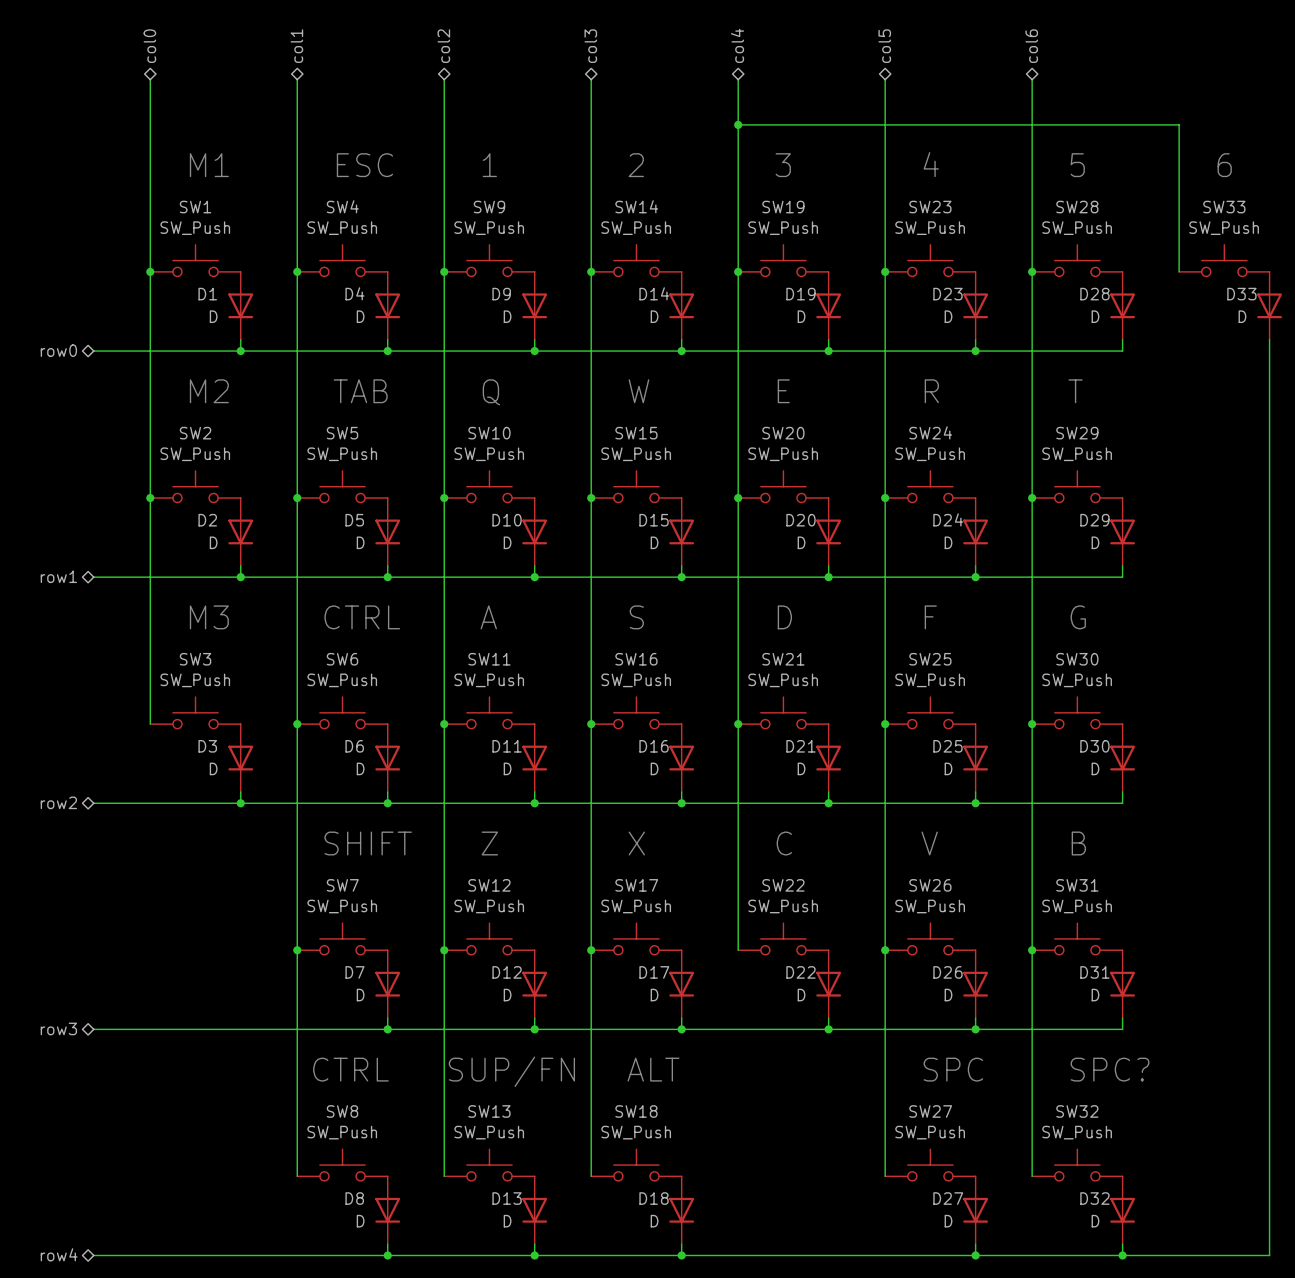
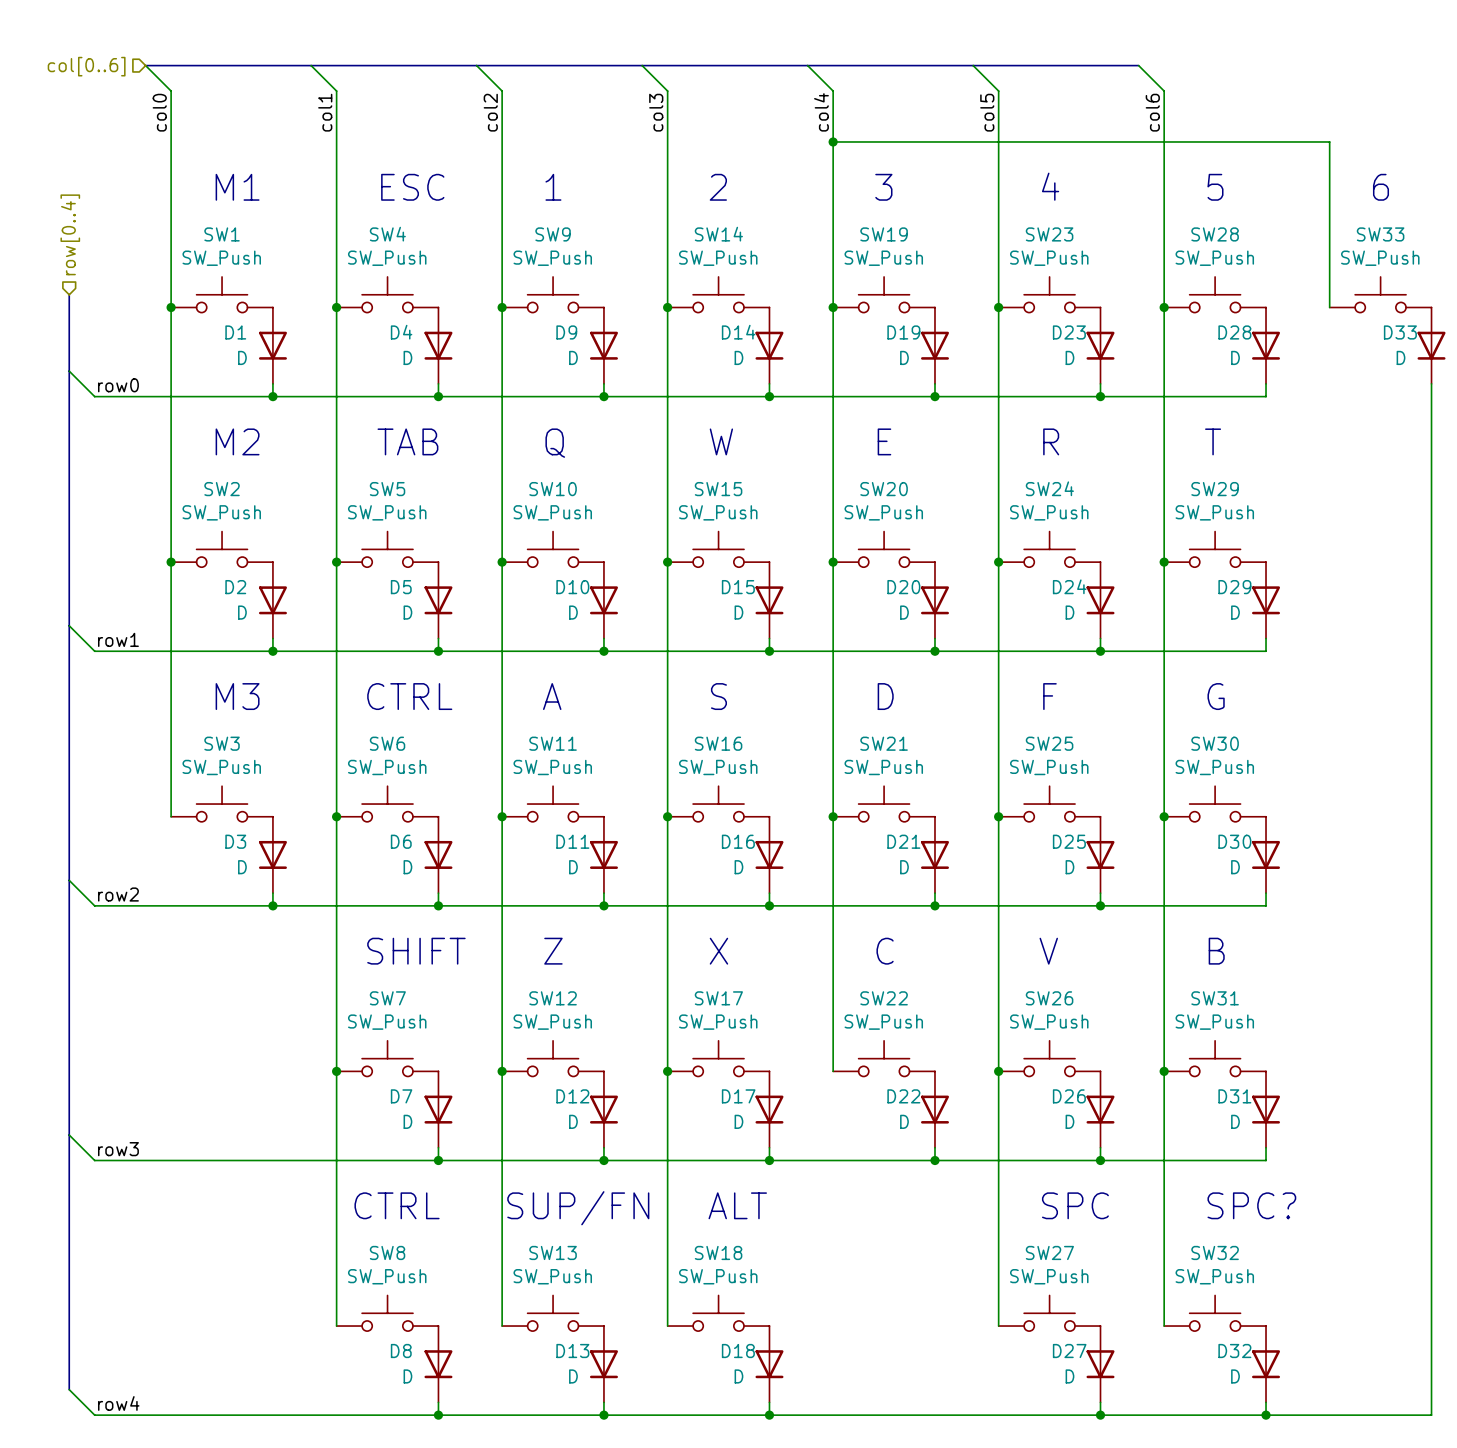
hierarchical label: col4 (737, 45) -> none
hierarchical label: col0 (149, 46) -> none
hierarchical label: col1 (296, 46) -> none
hierarchical label: col2 (443, 46) -> none
hierarchical label: col3 (590, 46) -> none
hierarchical label: col5 (884, 46) -> none
hierarchical label: col6 (1031, 46) -> none
wire: none -> (145, 65) (171, 91)
bus: none -> (145, 65) (1138, 65)
wire: none -> (311, 65) (336, 91)
wire: none -> (476, 65) (502, 91)
wire: none -> (642, 65) (667, 91)
wire: none -> (807, 65) (833, 91)
wire: none -> (973, 65) (998, 91)
wire: none -> (1138, 65) (1164, 91)
hierarchical label: none -> col[0..6] (86, 66)
label: none -> col0 (159, 112)
label: none -> col1 (325, 112)
label: none -> col2 (490, 112)
label: none -> col3 (656, 112)
label: none -> col4 (821, 112)
label: none -> col5 (987, 112)
label: none -> col6 (1152, 112)
hierarchical label: none -> row[0..4] (70, 234)
bus: none -> (69, 294) (69, 1389)
wire: none -> (69, 371) (94, 396) (107, 396)
label: none -> row0 (118, 385)
hierarchical label: row0 (58, 350) -> none
wire: none -> (69, 625) (94, 651) (107, 651)
label: none -> row1 (118, 639)
hierarchical label: row1 (58, 576) -> none
wire: none -> (69, 880) (94, 905) (107, 905)
label: none -> row2 (118, 894)
hierarchical label: row2 (58, 802) -> none
wire: none -> (69, 1135) (94, 1160) (107, 1160)
label: none -> row3 (118, 1149)
hierarchical label: row3 (58, 1028) -> none
wire: none -> (69, 1389) (94, 1415) (107, 1415)
label: none -> row4 (118, 1403)
hierarchical label: row4 (59, 1254) -> none

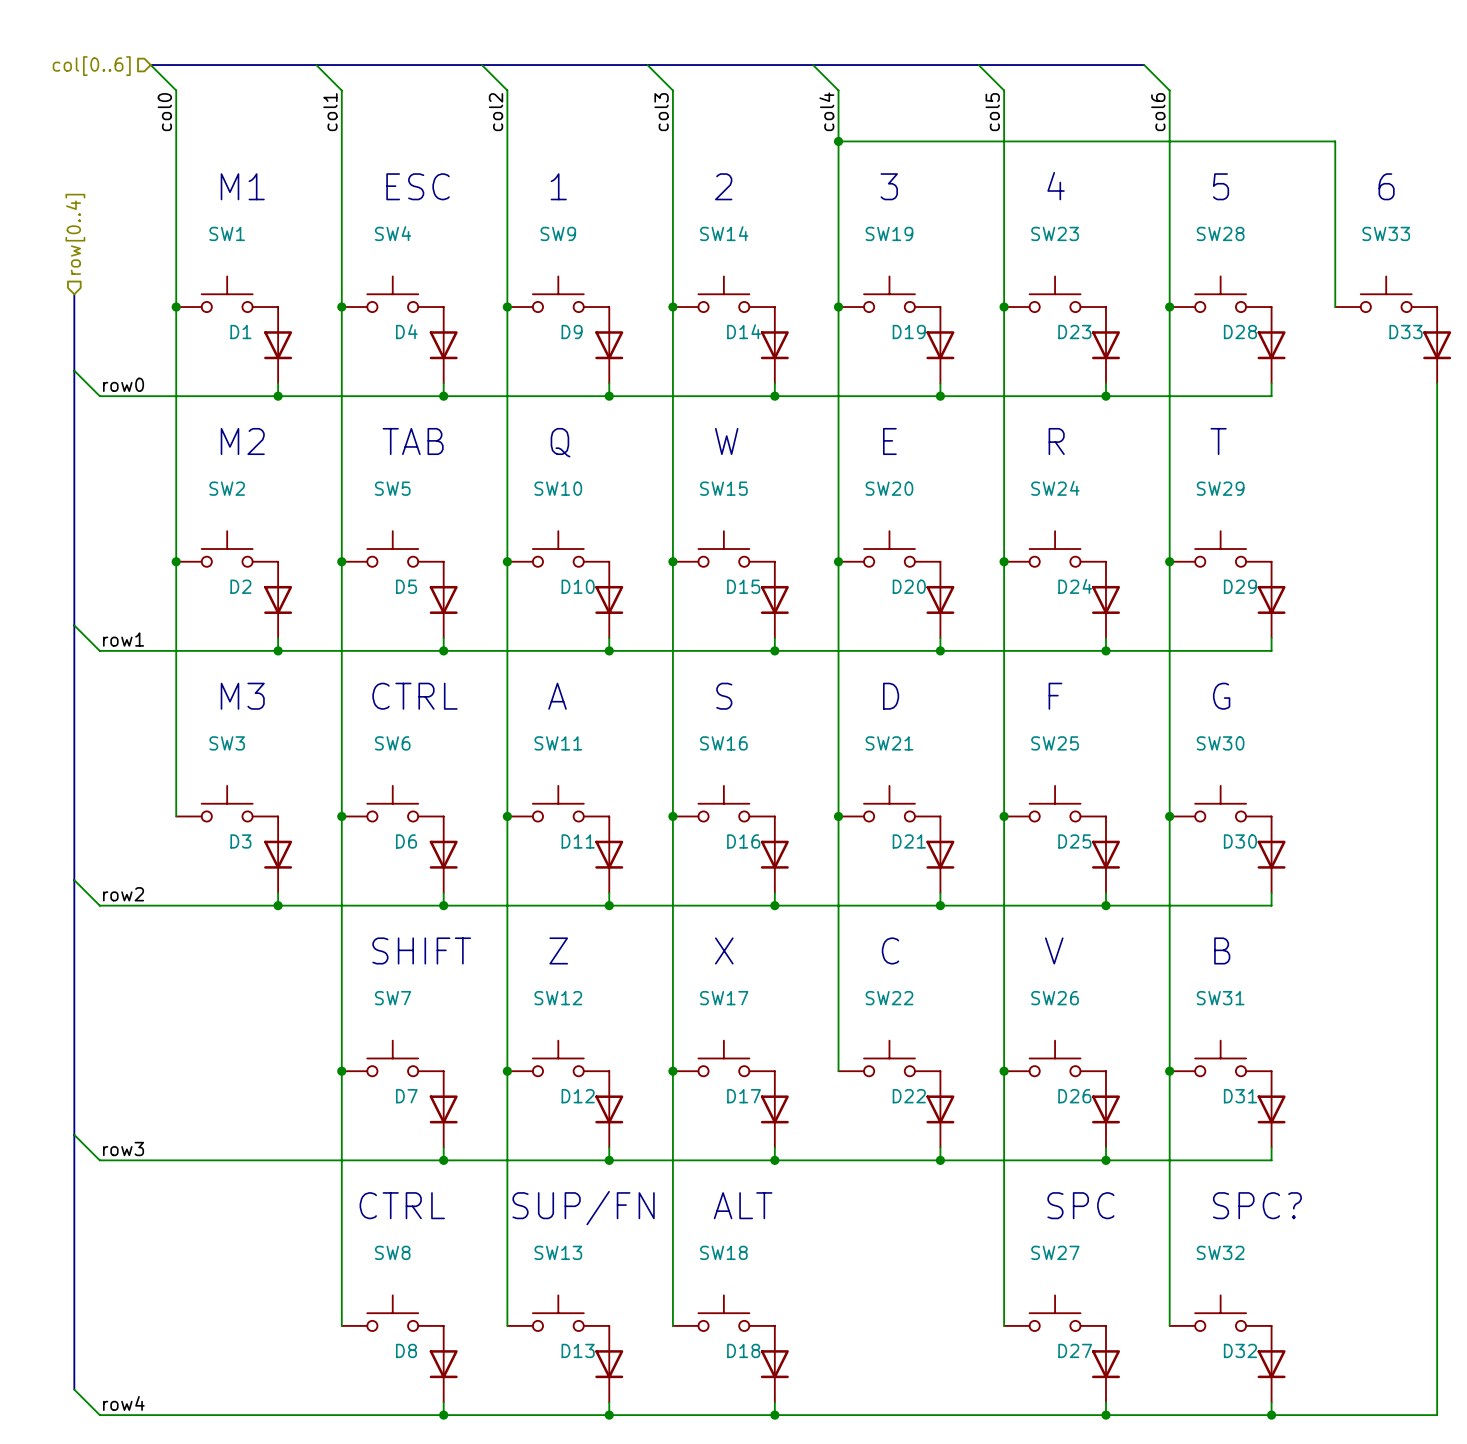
SW1 value: SW_Push (221, 258) -> none
SW4 value: SW_Push (387, 258) -> none
SW9 value: SW_Push (552, 258) -> none
SW14 value: SW_Push (718, 258) -> none
SW19 value: SW_Push (883, 258) -> none
SW23 value: SW_Push (1049, 258) -> none
SW28 value: SW_Push (1214, 258) -> none
SW33 value: SW_Push (1380, 258) -> none
D1 value: D (242, 357) -> none
D4 value: D (407, 357) -> none
D9 value: D (573, 357) -> none
D14 value: D (738, 357) -> none
D19 value: D (904, 357) -> none
D23 value: D (1069, 357) -> none
D28 value: D (1235, 357) -> none
D33 value: D (1401, 357) -> none
SW2 value: SW_Push (221, 512) -> none
SW5 value: SW_Push (387, 512) -> none
SW10 value: SW_Push (552, 512) -> none
SW15 value: SW_Push (718, 512) -> none
SW20 value: SW_Push (883, 512) -> none
SW24 value: SW_Push (1049, 512) -> none
SW29 value: SW_Push (1214, 512) -> none
D2 value: D (242, 612) -> none
D5 value: D (407, 612) -> none
D10 value: D (573, 612) -> none
D15 value: D (738, 612) -> none
D20 value: D (904, 612) -> none
D24 value: D (1069, 612) -> none
D29 value: D (1235, 612) -> none
SW3 value: SW_Push (221, 767) -> none
SW6 value: SW_Push (387, 767) -> none
SW11 value: SW_Push (552, 767) -> none
SW16 value: SW_Push (718, 767) -> none
SW21 value: SW_Push (883, 767) -> none
SW25 value: SW_Push (1049, 767) -> none
SW30 value: SW_Push (1214, 767) -> none
D3 value: D (242, 867) -> none
D6 value: D (407, 867) -> none
D11 value: D (573, 867) -> none
D16 value: D (738, 867) -> none
D21 value: D (904, 867) -> none
D25 value: D (1069, 867) -> none
D30 value: D (1235, 867) -> none
SW7 value: SW_Push (387, 1022) -> none
SW12 value: SW_Push (552, 1022) -> none
SW17 value: SW_Push (718, 1022) -> none
SW22 value: SW_Push (883, 1022) -> none
SW26 value: SW_Push (1049, 1022) -> none
SW31 value: SW_Push (1214, 1022) -> none
D7 value: D (407, 1121) -> none
D12 value: D (573, 1121) -> none
D17 value: D (738, 1121) -> none
D22 value: D (904, 1121) -> none
D26 value: D (1069, 1121) -> none
D31 value: D (1235, 1121) -> none
SW8 value: SW_Push (387, 1276) -> none
SW13 value: SW_Push (552, 1276) -> none
SW18 value: SW_Push (718, 1276) -> none
SW27 value: SW_Push (1049, 1276) -> none
SW32 value: SW_Push (1214, 1276) -> none
D8 value: D (407, 1376) -> none
D13 value: D (573, 1376) -> none
D18 value: D (738, 1376) -> none
D27 value: D (1069, 1376) -> none
D32 value: D (1235, 1376) -> none

